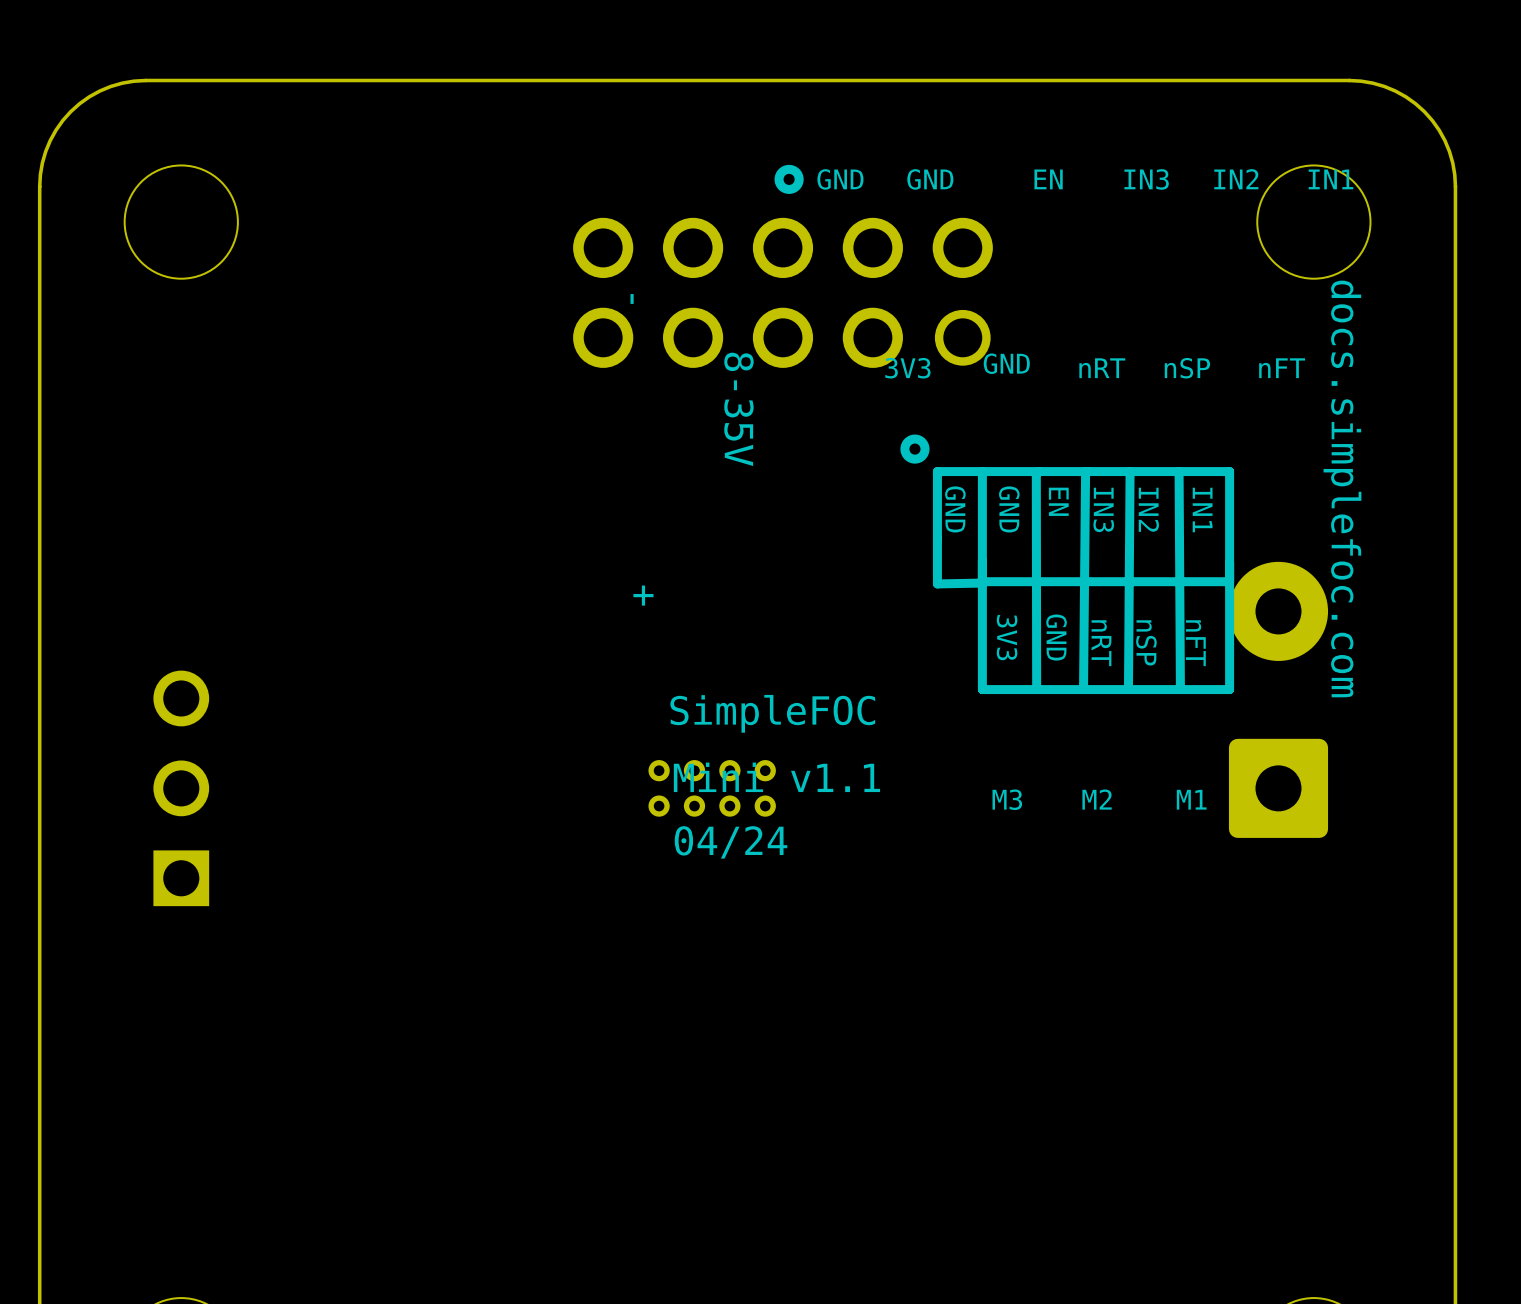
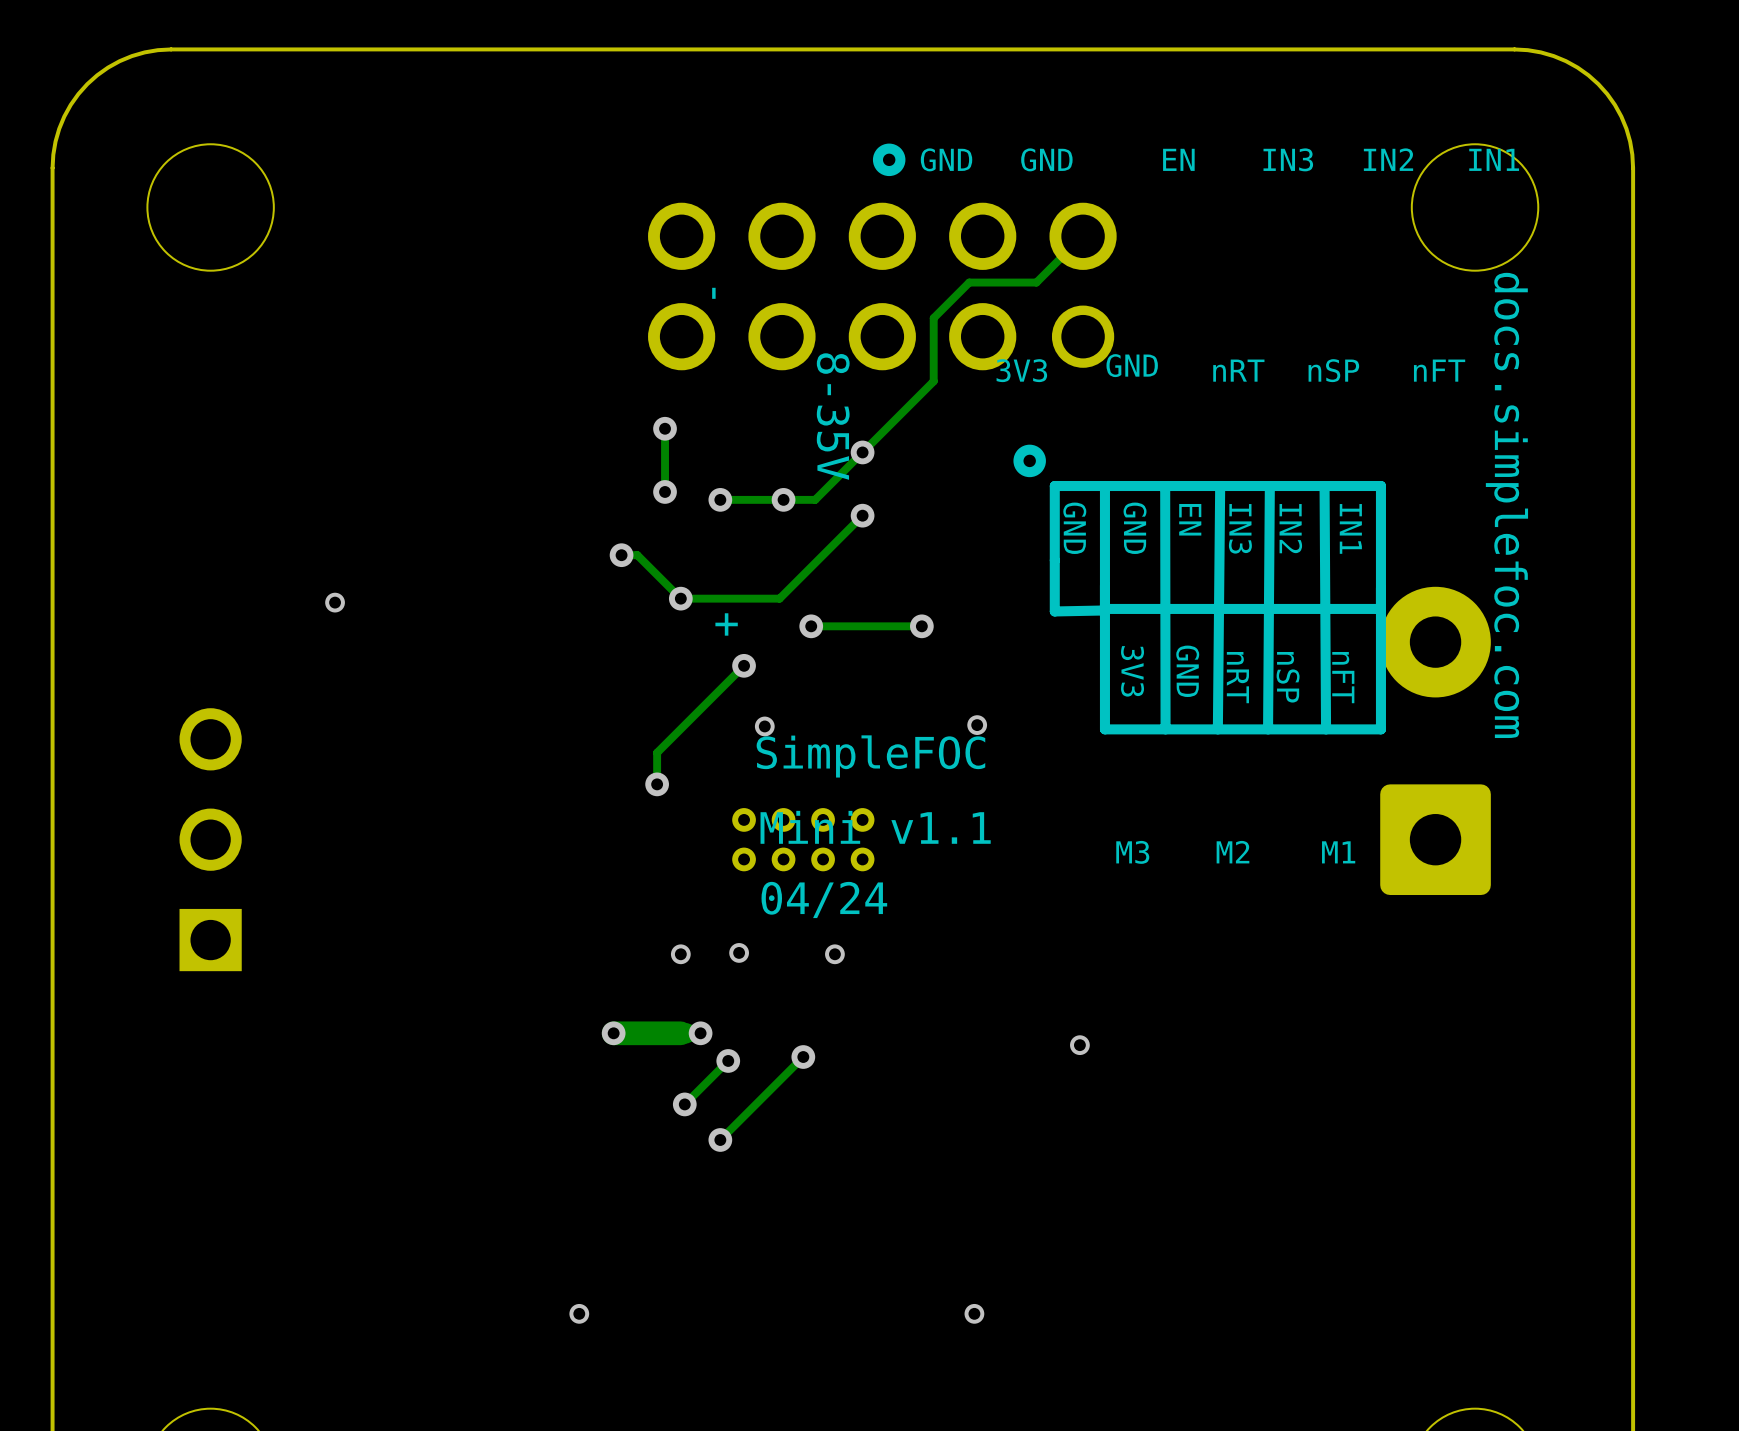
track: none -> (1083, 236) (1036, 282) (969, 282) (933, 318) (933, 381) (815, 499) (720, 499)
track: none -> (665, 428) (665, 491)
via: none -> (665, 428)
via: none -> (862, 452)
via: none -> (665, 491)
via: none -> (720, 499)
via: none -> (783, 499)
track: none -> (862, 515) (779, 598) (680, 598) (637, 555) (621, 555)
via: none -> (862, 515)
via: none -> (621, 555)
via: none -> (680, 598)
via: none -> (335, 602)
via: none -> (811, 626)
track: none -> (921, 626) (811, 626)
via: none -> (921, 626)
track: none -> (744, 665) (657, 752) (657, 784)
via: none -> (744, 665)
via: none -> (977, 725)
via: none -> (764, 726)
via: none -> (657, 784)
via: none -> (739, 952)
via: none -> (680, 954)
via: none -> (834, 954)
via: none -> (613, 1033)
track: none -> (700, 1033) (613, 1033)
via: none -> (700, 1033)
via: none -> (1079, 1045)
track: none -> (803, 1057) (720, 1139)
via: none -> (803, 1057)
track: none -> (728, 1060) (684, 1104)
via: none -> (728, 1060)
via: none -> (684, 1104)
via: none -> (720, 1139)
via: none -> (579, 1313)
via: none -> (974, 1313)

